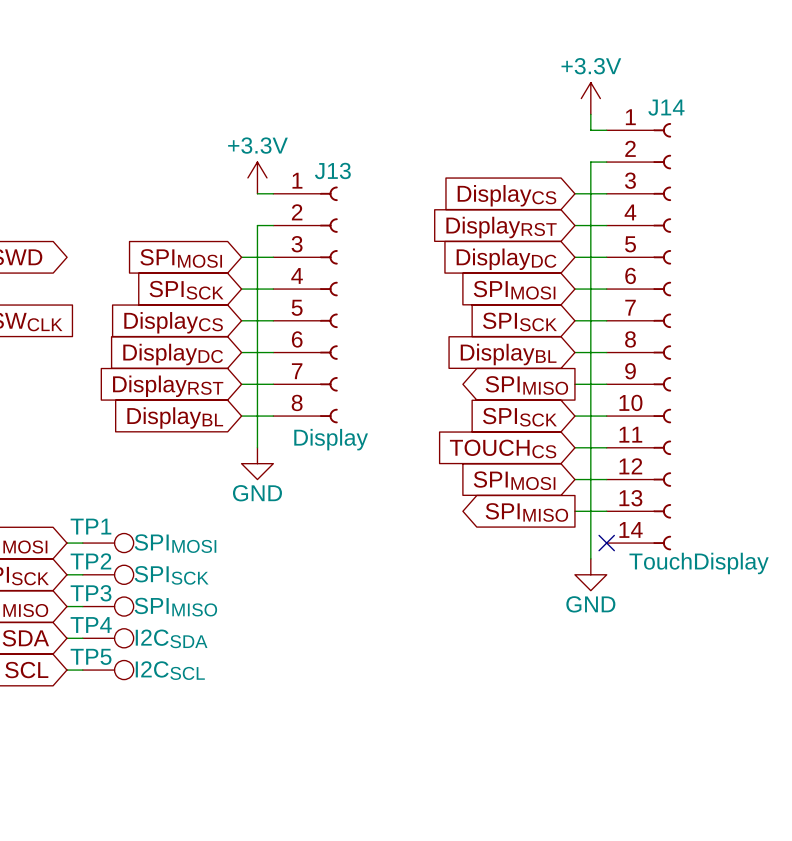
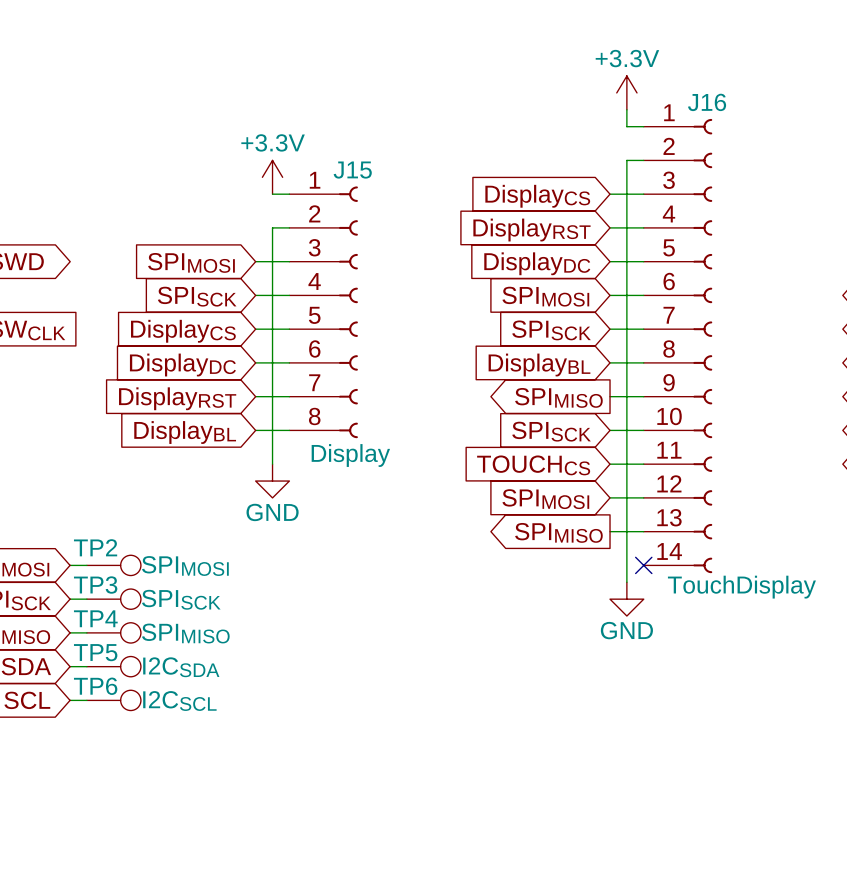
J14 name: J14 (666, 107) -> J16 (707, 102)
J13 name: J13 (332, 170) -> J15 (352, 170)
TP1 name: TP1 (90, 526) -> TP2 (95, 547)
TP2 name: TP2 (90, 561) -> TP3 (95, 585)
TP3 name: TP3 (91, 593) -> TP4 (95, 618)
TP4 name: TP4 (91, 625) -> TP5 (95, 652)
TP5 name: TP5 (91, 656) -> TP6 (95, 686)

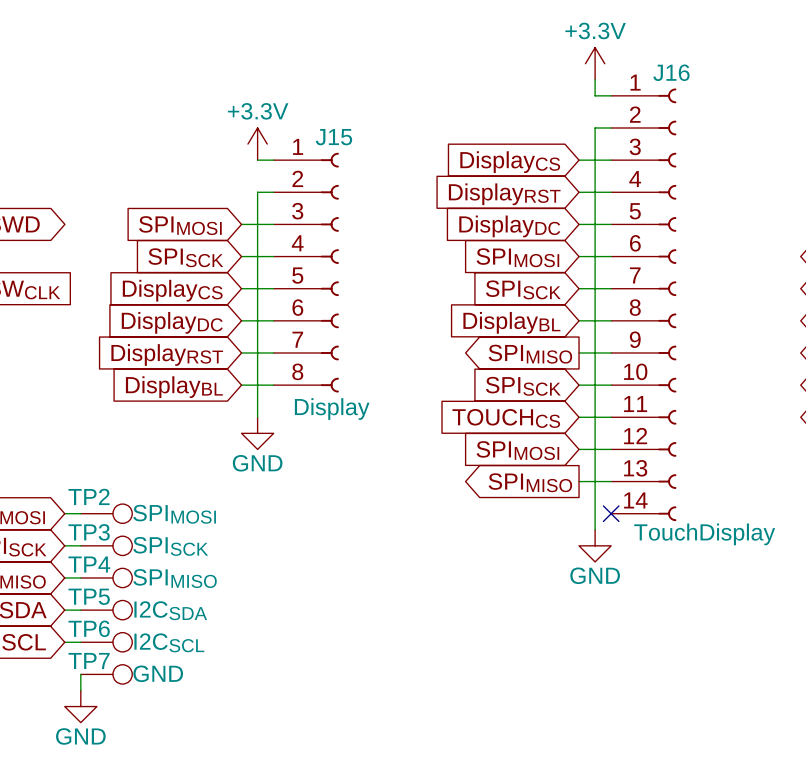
wire: none -> (80, 674) (80, 690)
TP7: none -> GND (106, 674)
power symbol: none -> GND (80, 706)

